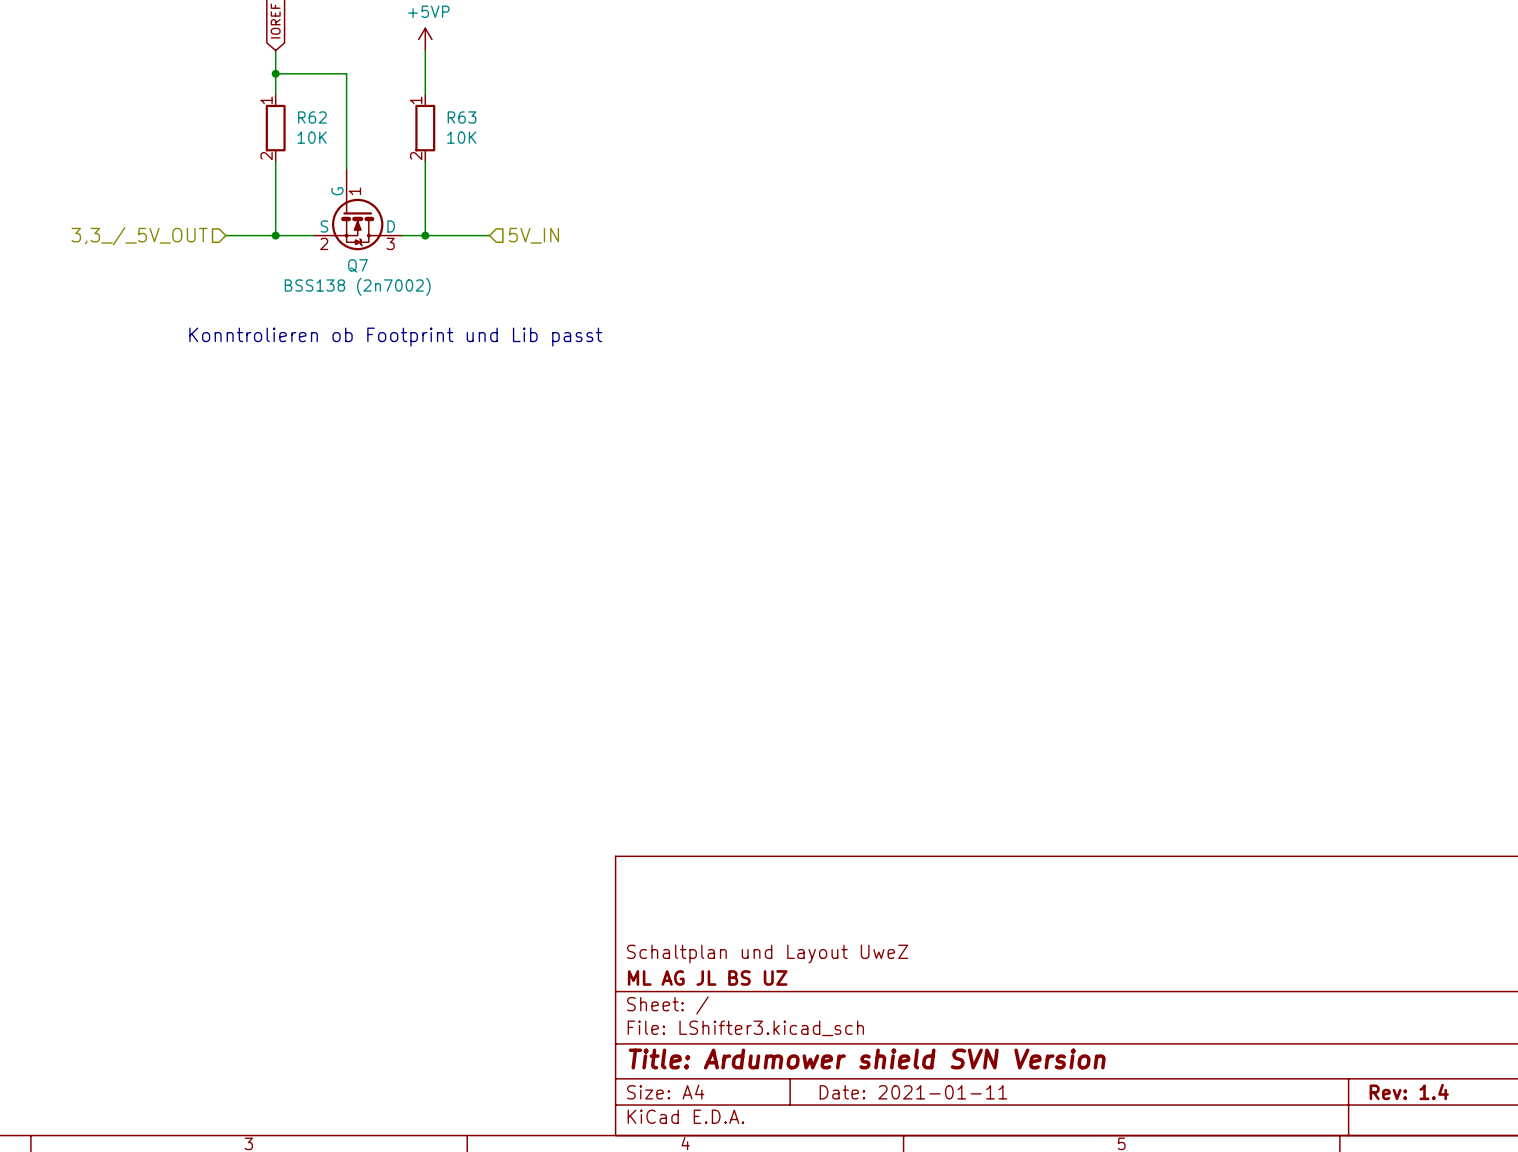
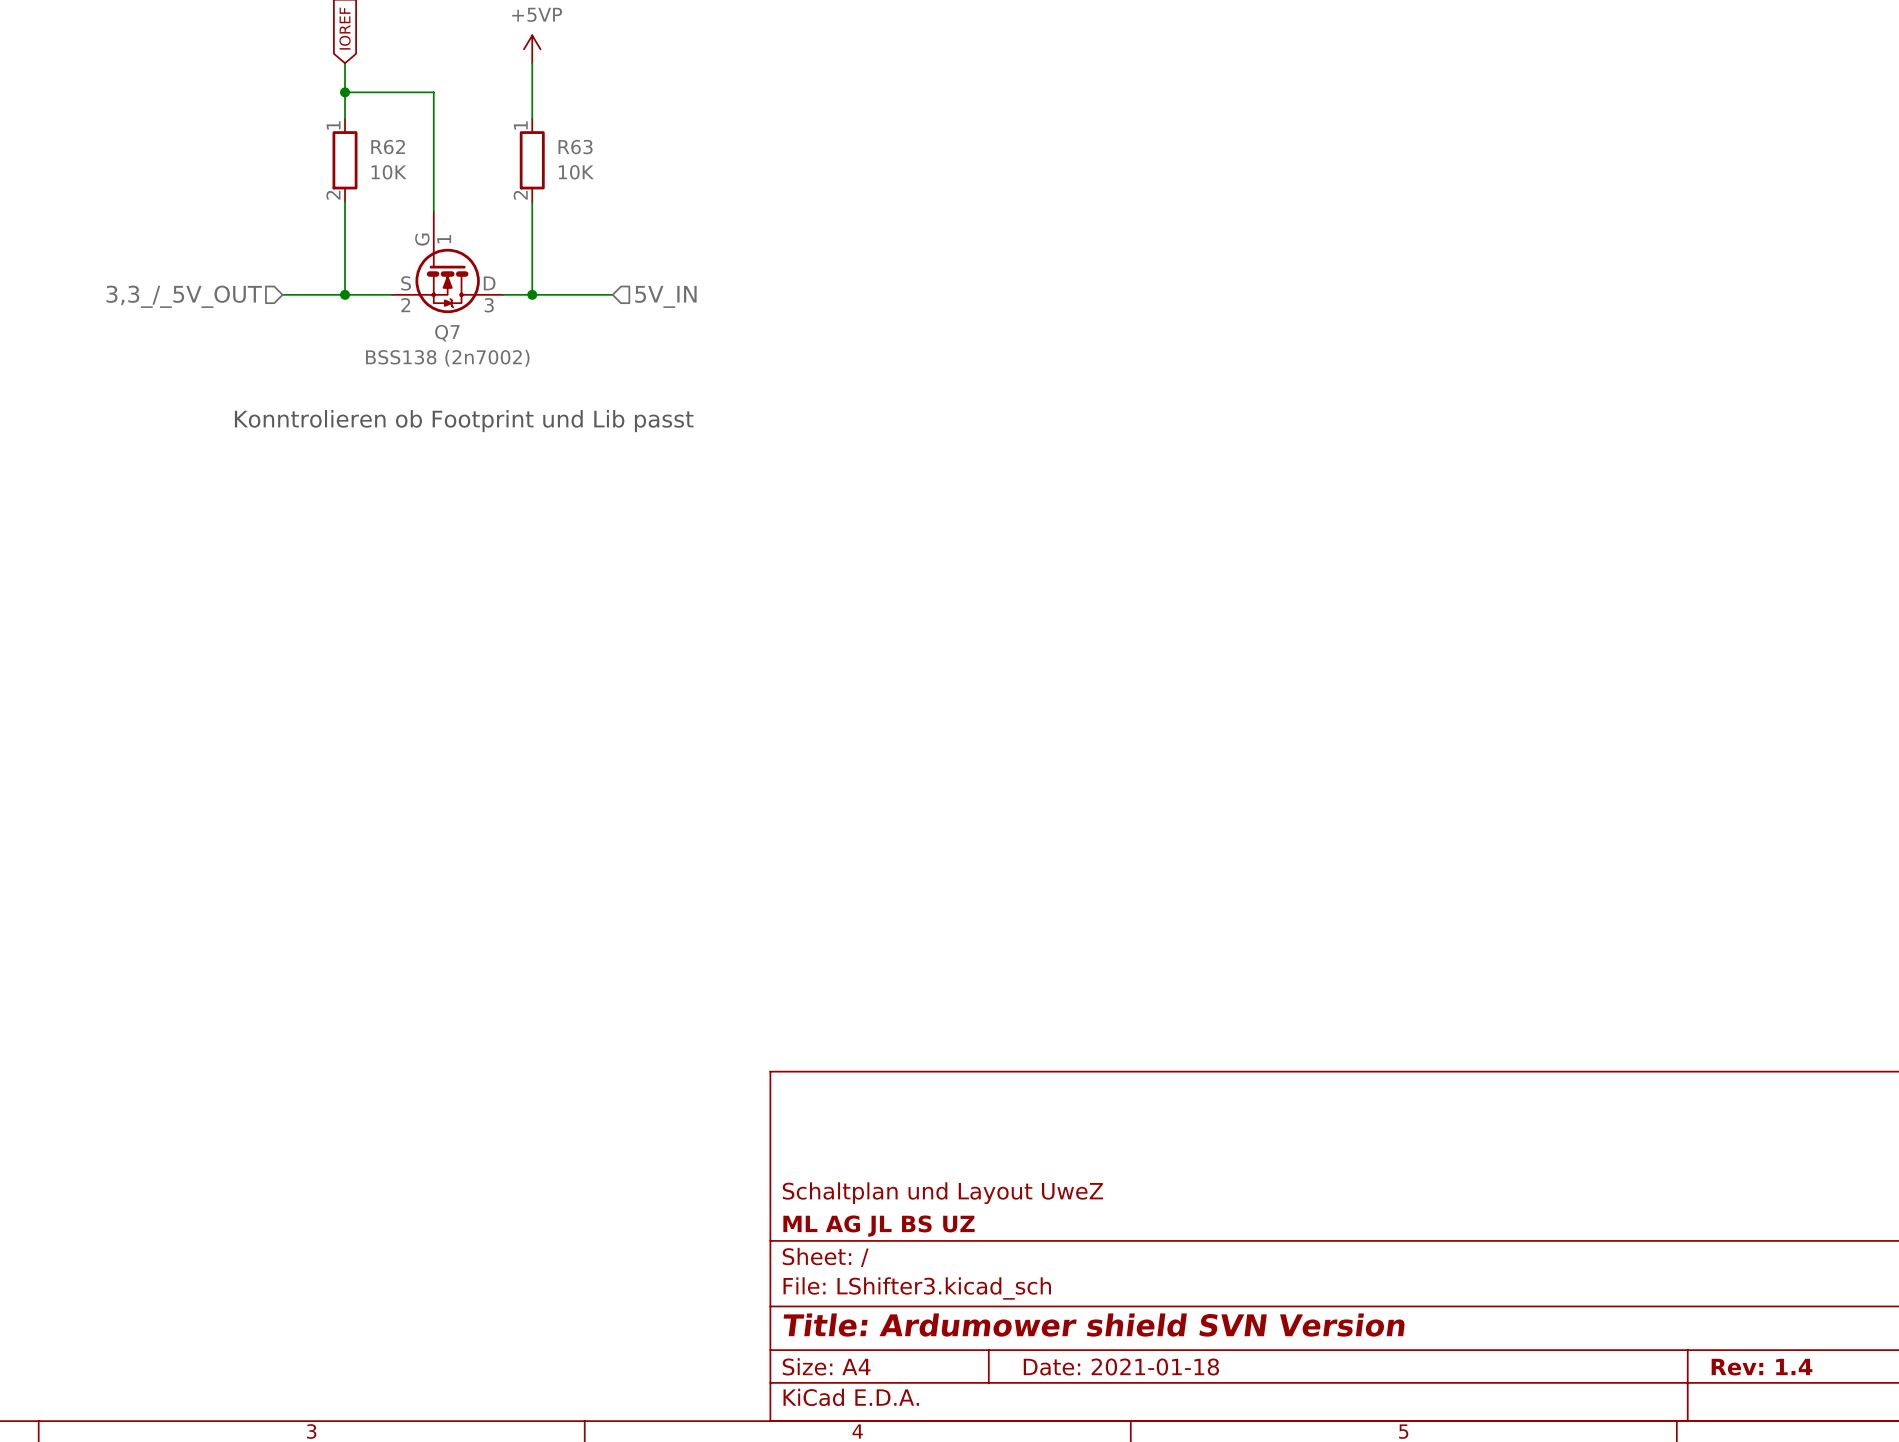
title block: Date: 2021-01-11 (913, 1092) -> Date: 2021-01-18 (1121, 1367)

